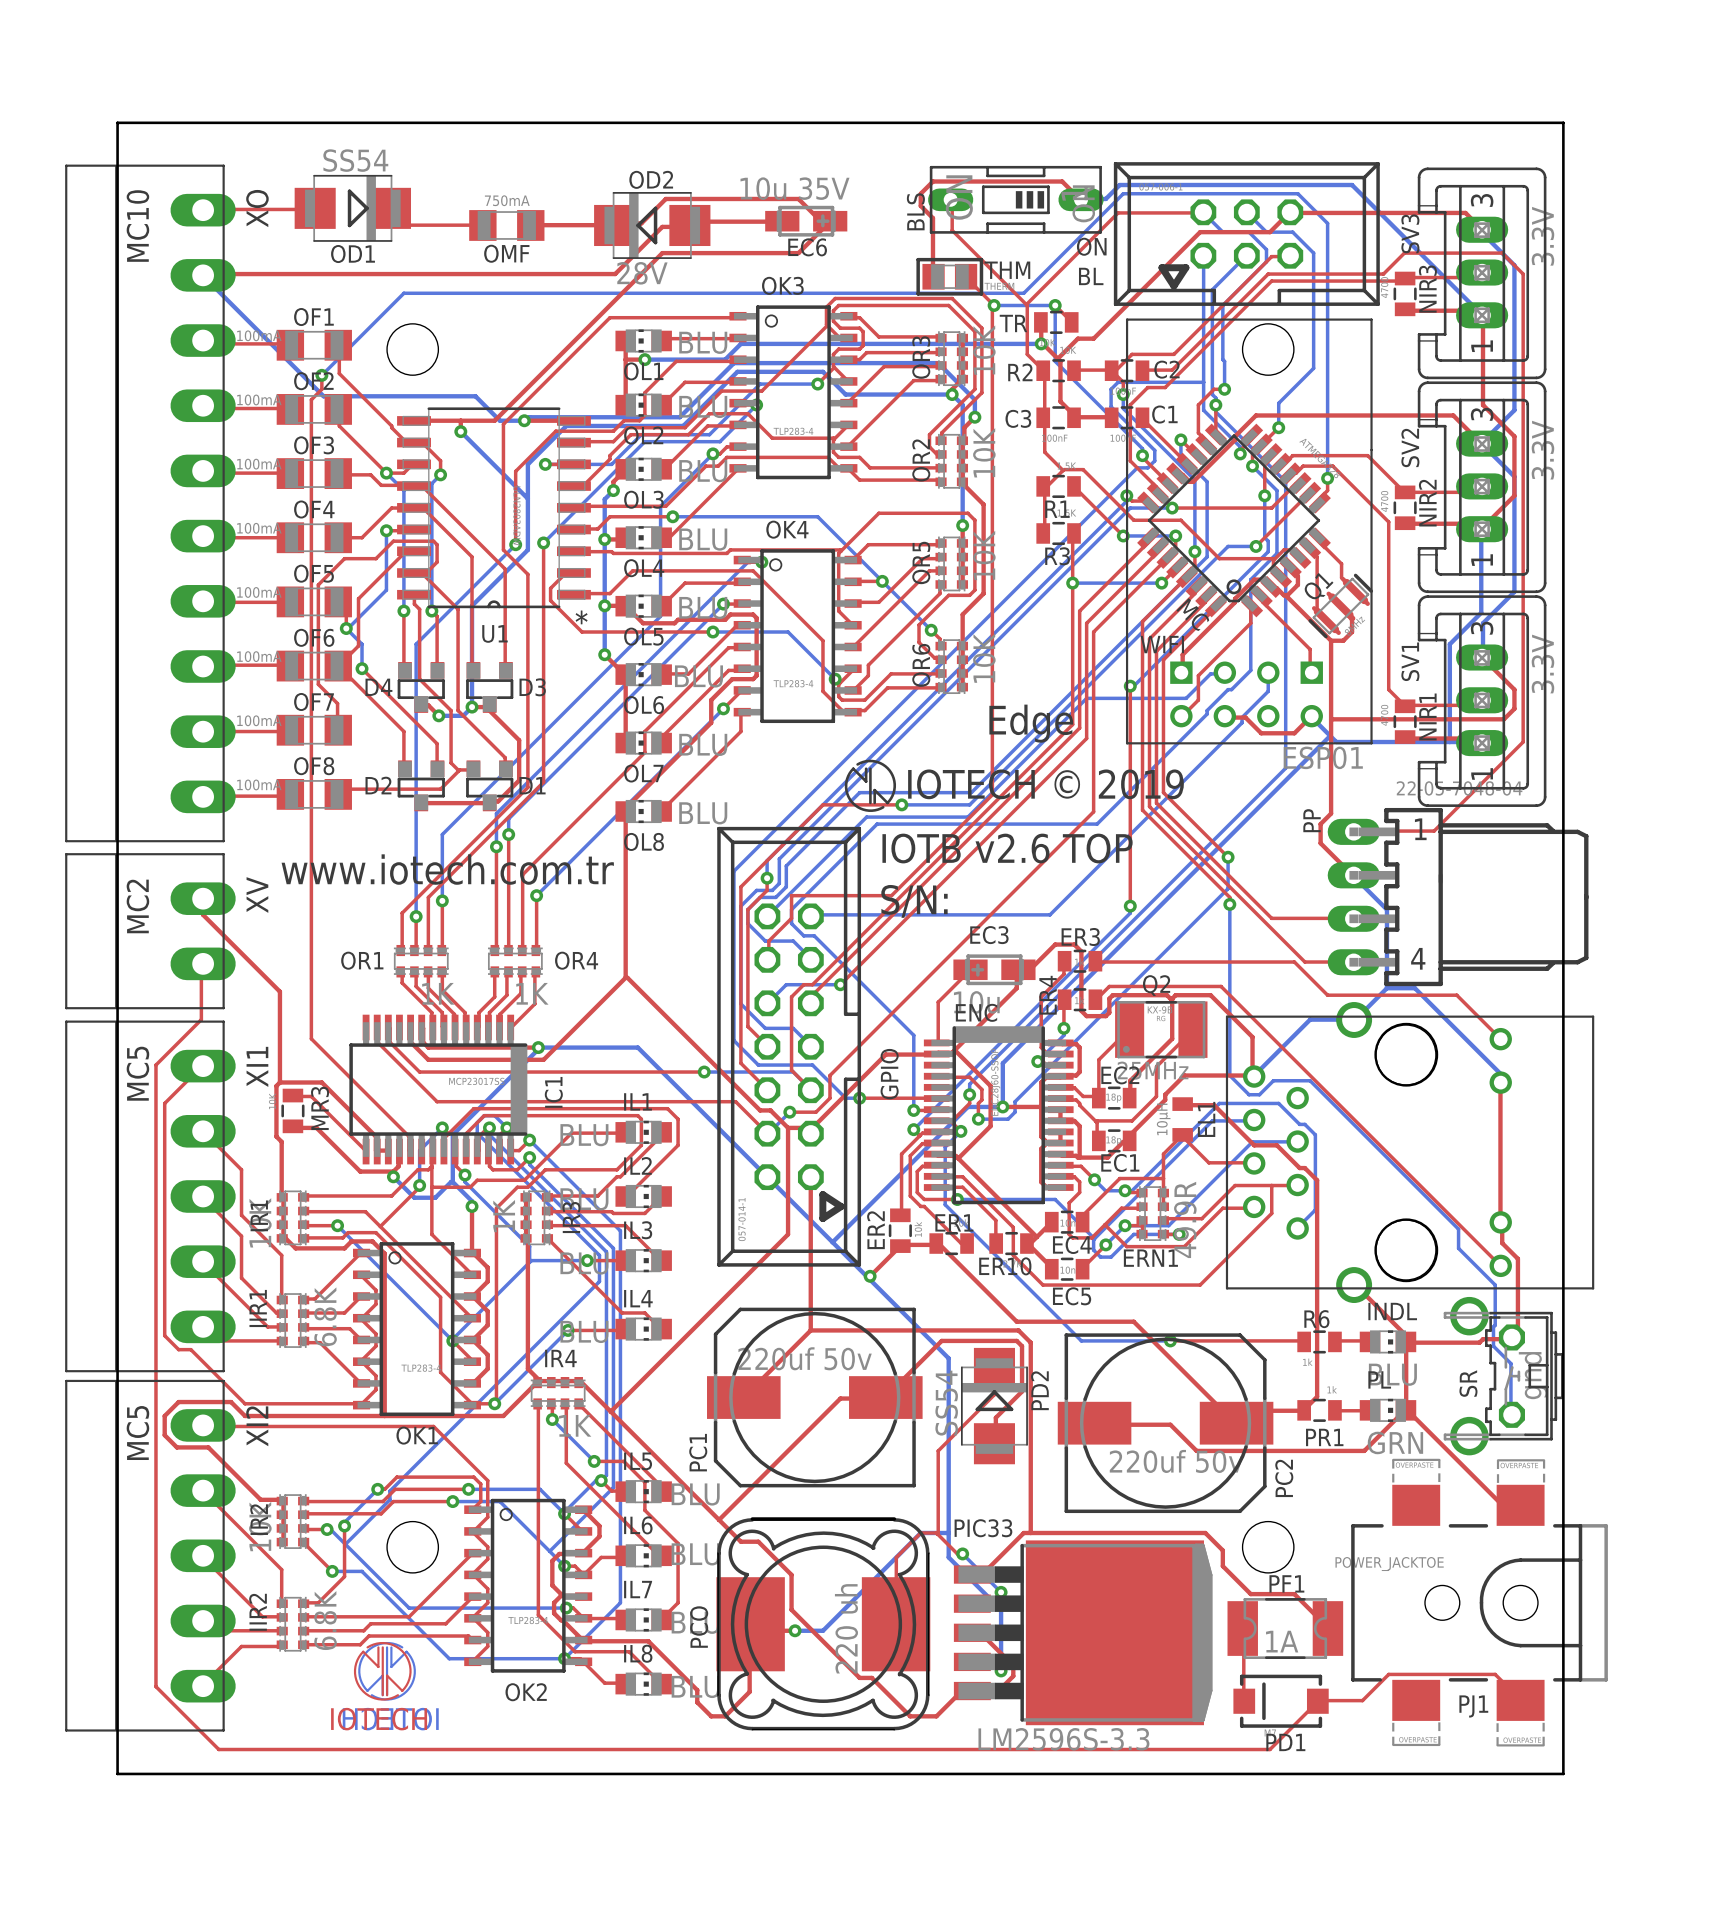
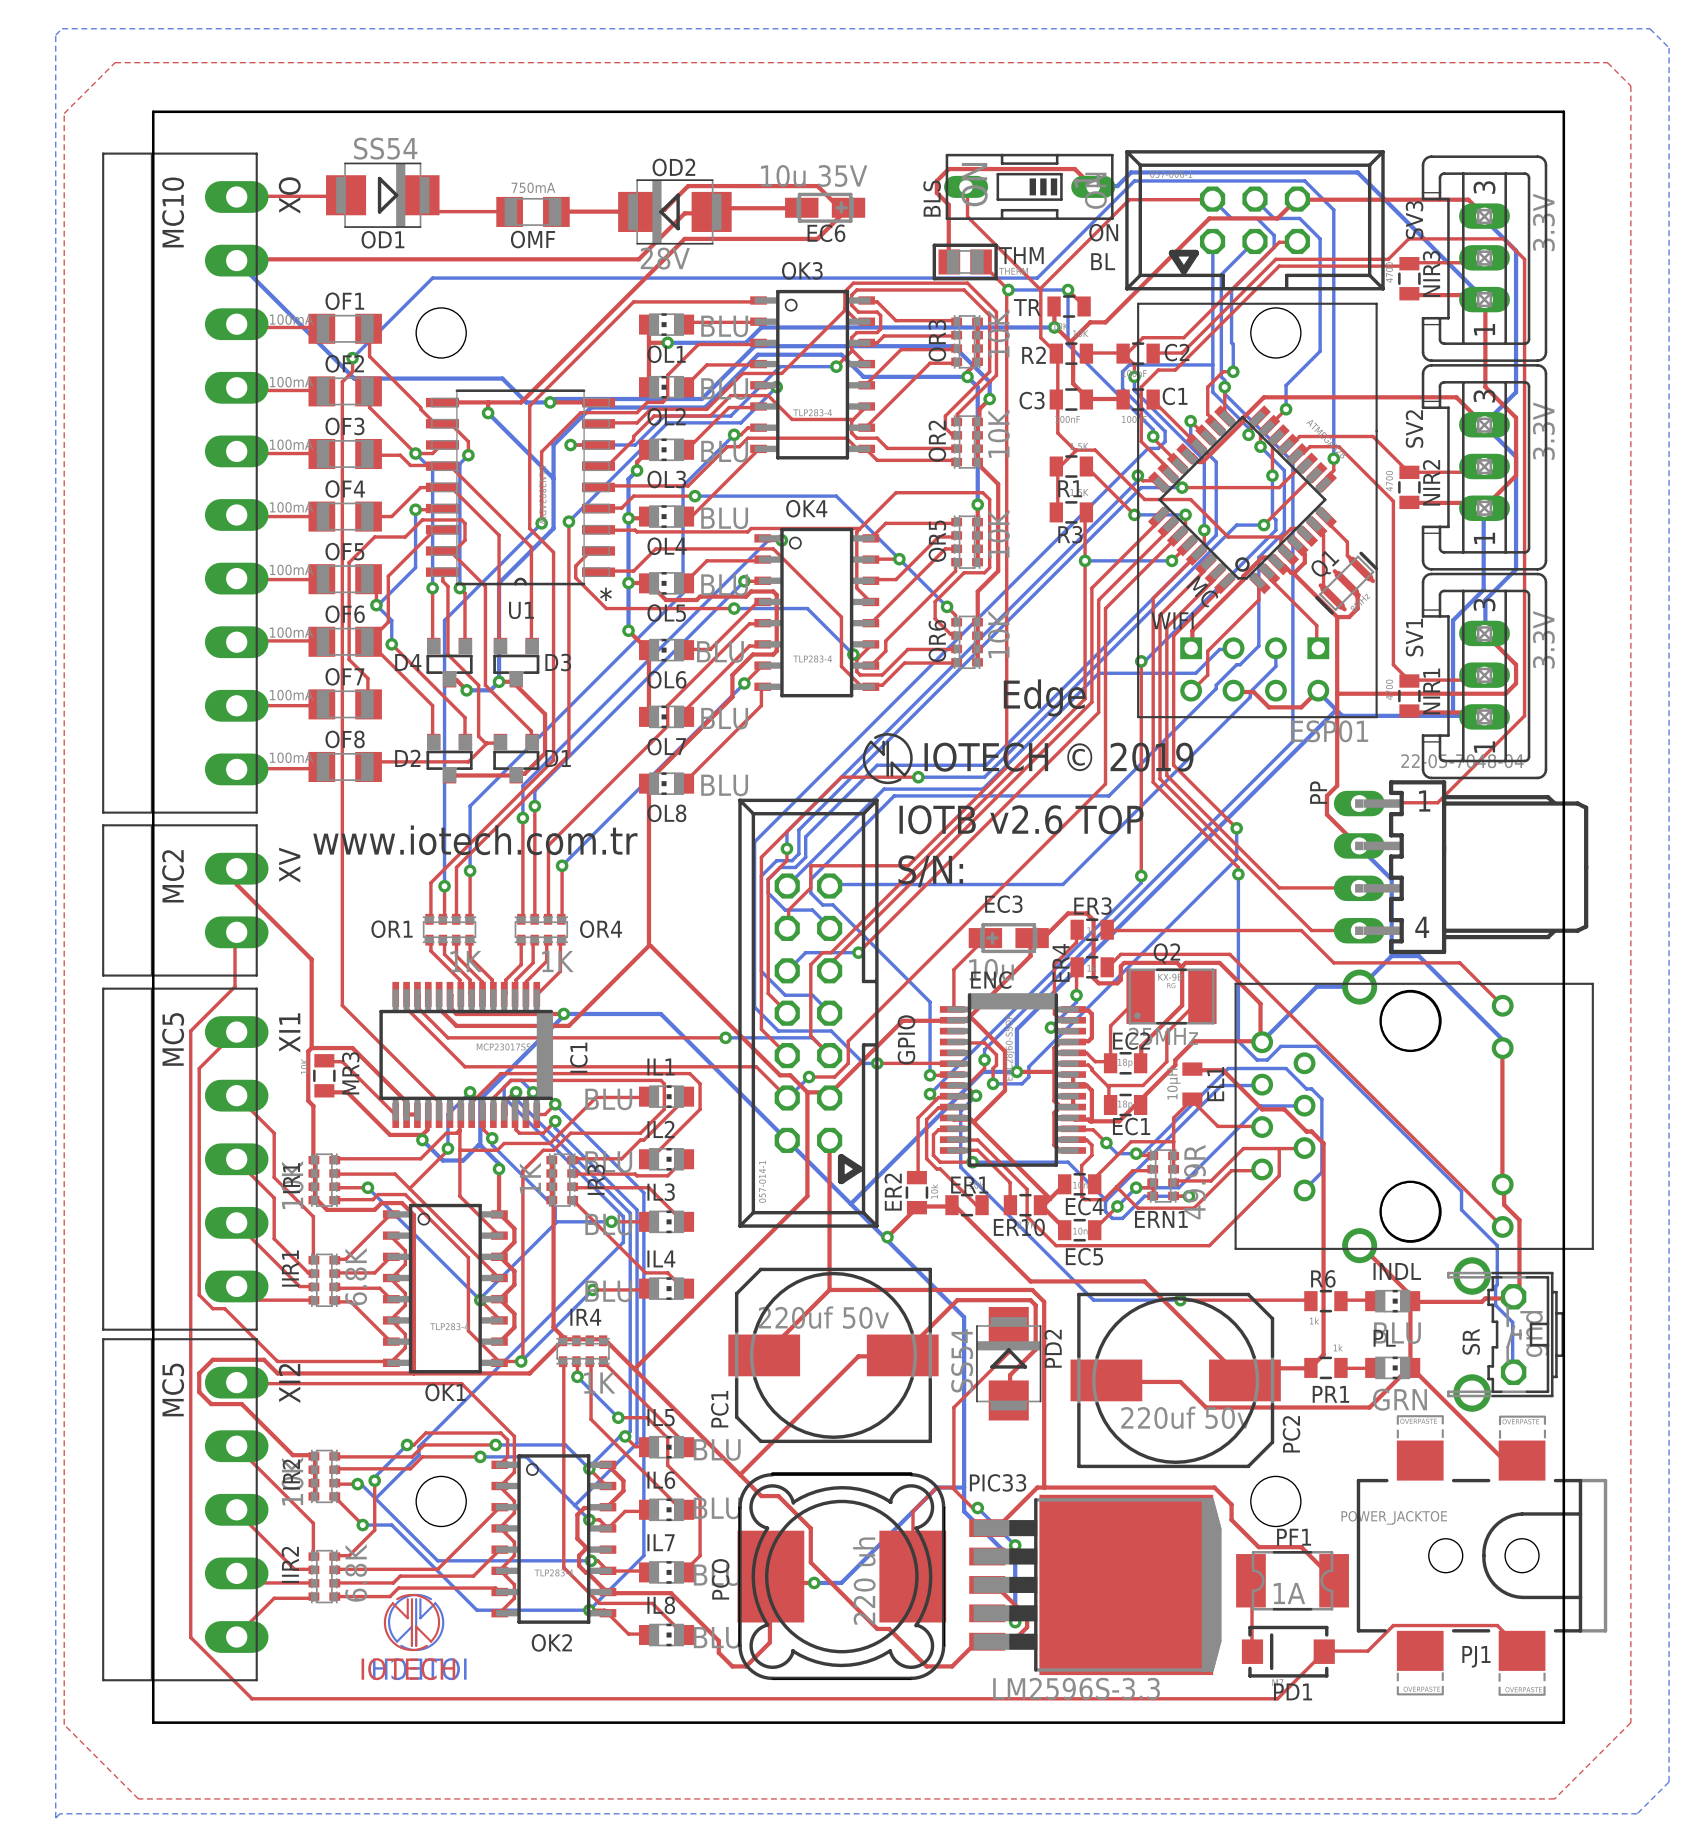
bottom zone outline: none -> (62, 28) (1649, 28) (1669, 47) (1669, 1782) (1637, 1813) (59, 1813) (55, 1818) (55, 35) (62, 28)
top zone outline: none -> (115, 62) (1607, 62) (1630, 86) (1630, 1722) (1554, 1798) (138, 1798) (64, 1724) (64, 113) (115, 62)

